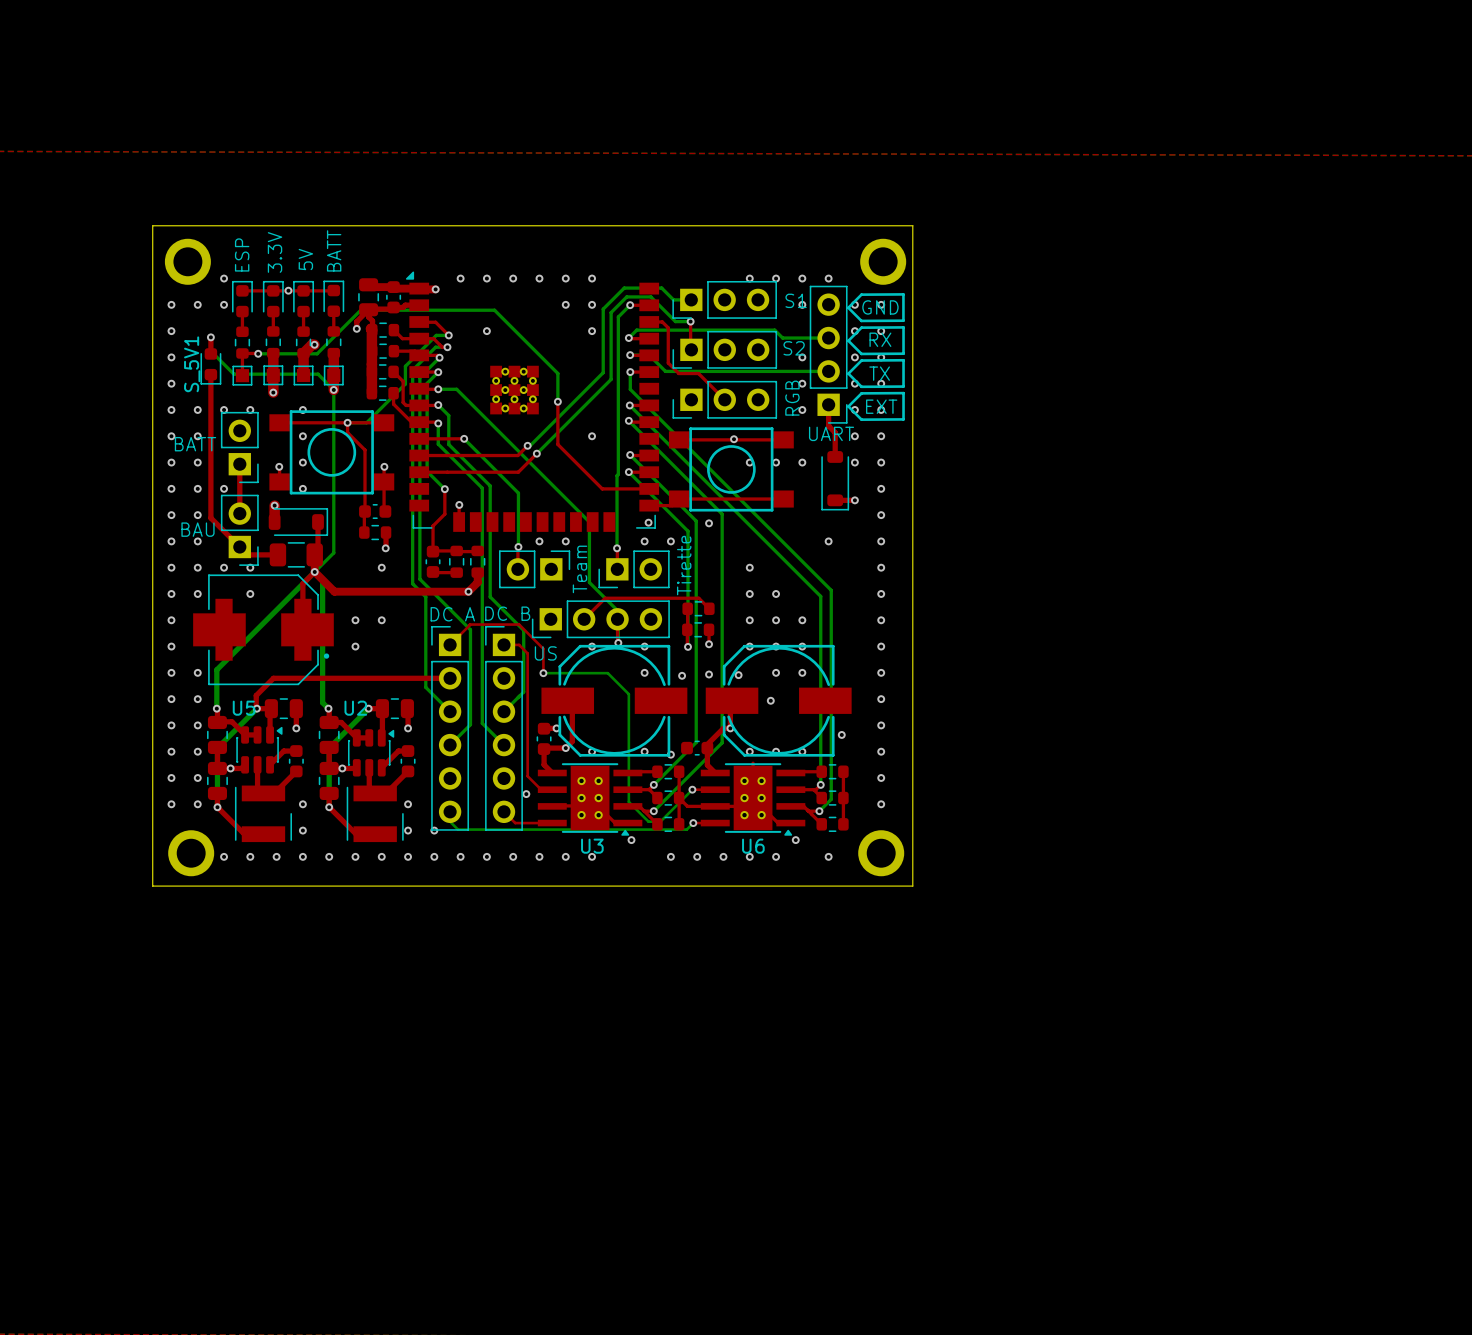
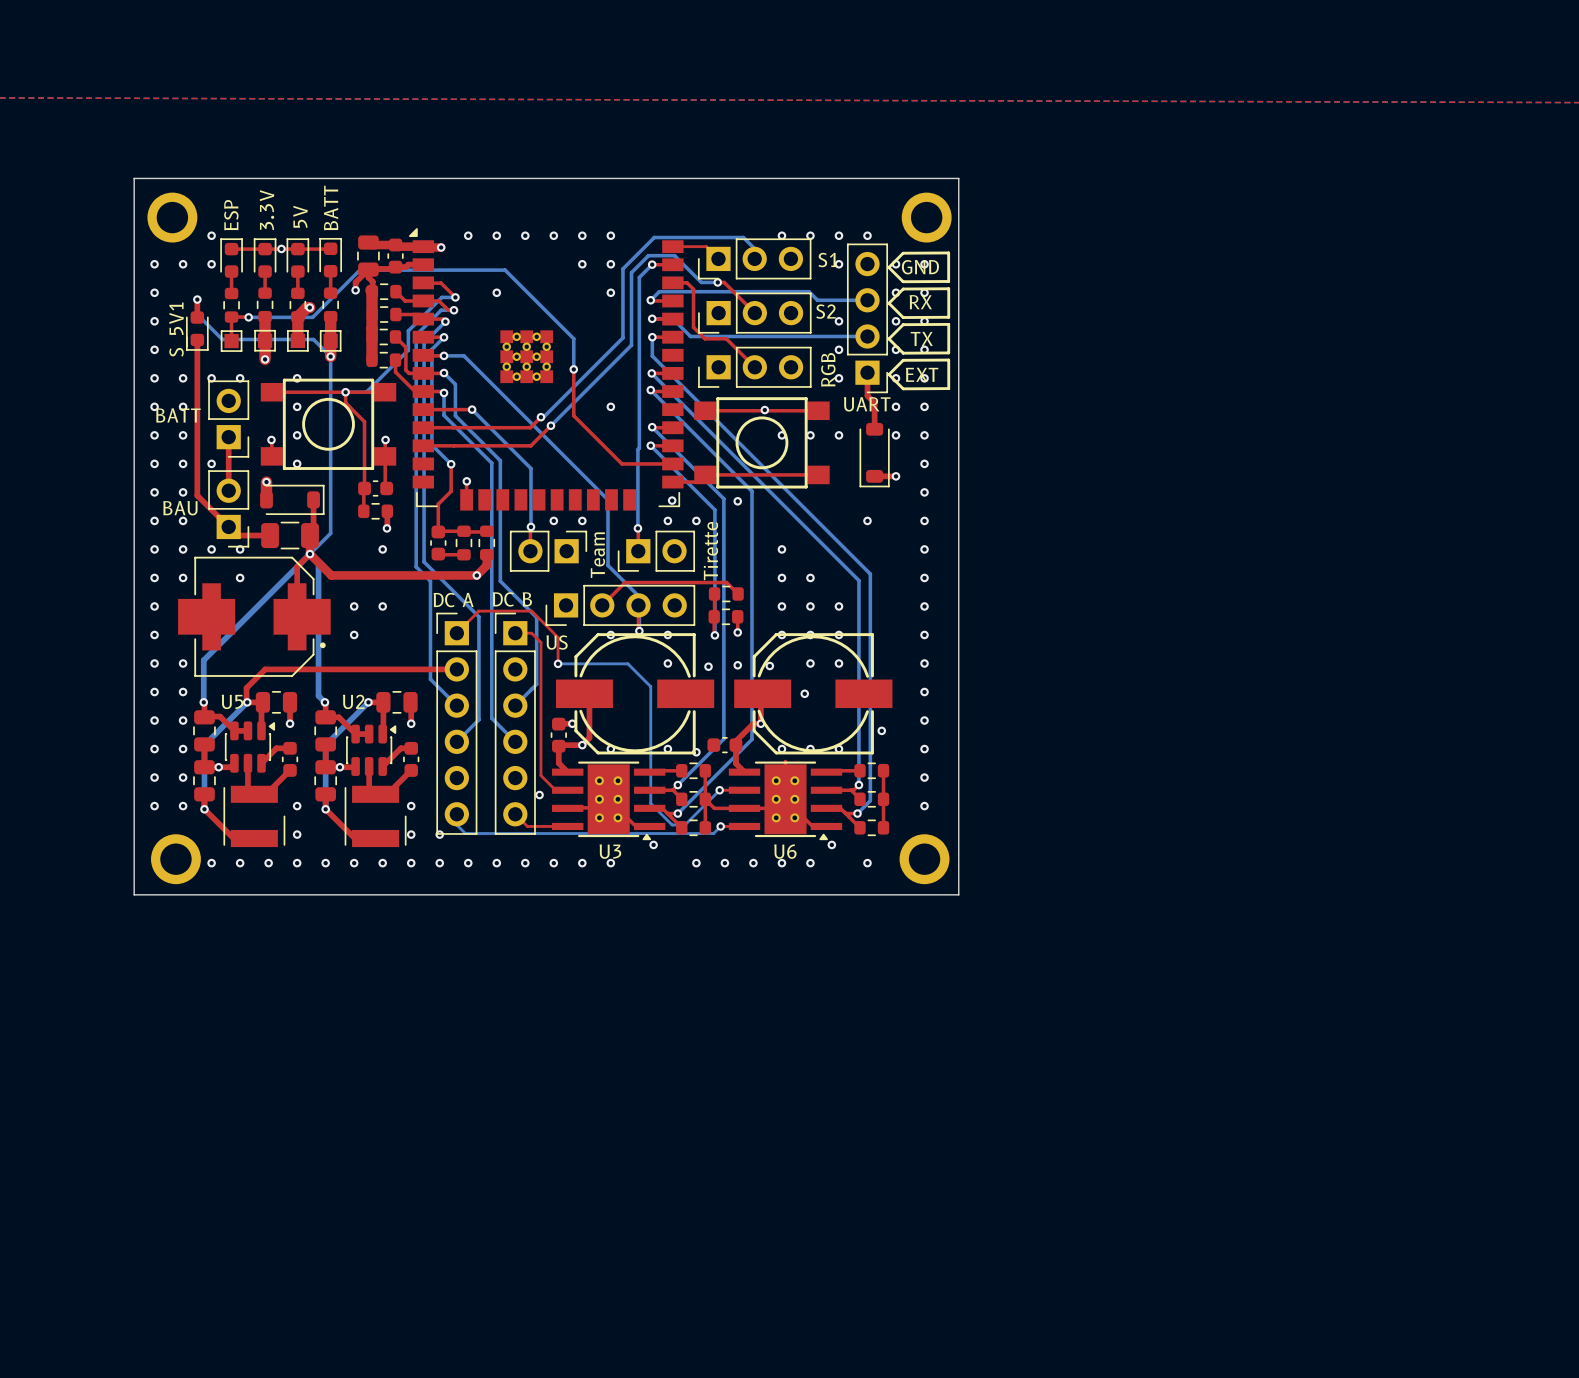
bottom track: (624, 288) (661, 288) (673, 299) (691, 299) -> (645, 246) (654, 237) (743, 237) (754, 248) (754, 258)
top track: none -> (672, 246) (706, 246) (718, 258)
top track: (690, 321) (691, 349) -> (717, 282) (724, 282) (754, 313)

